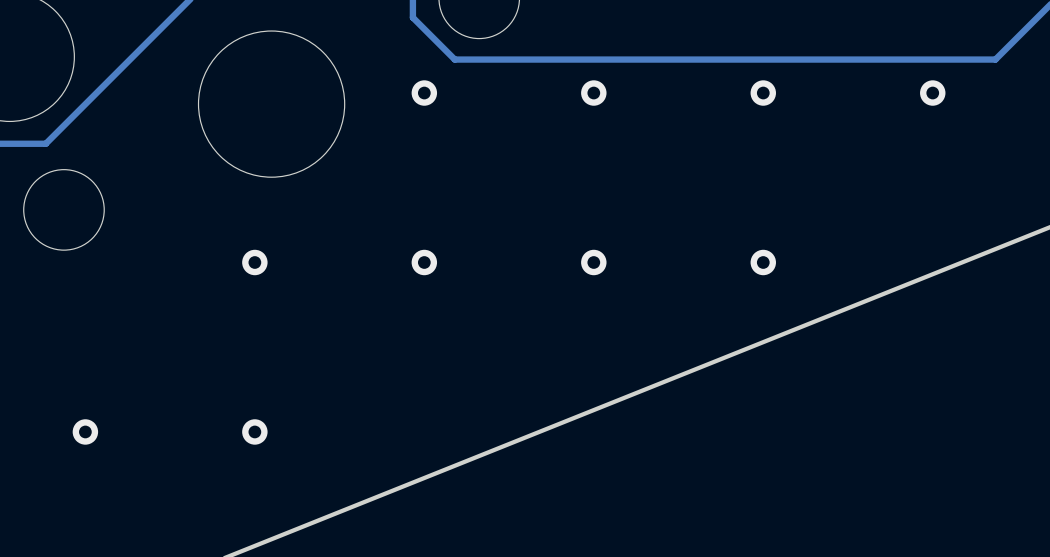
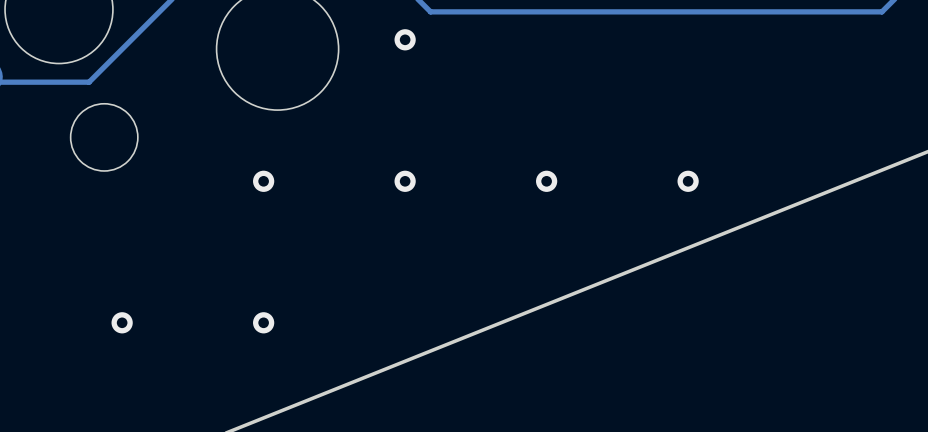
via: (593, 93) -> none
via: (763, 93) -> none
via: (932, 93) -> none

